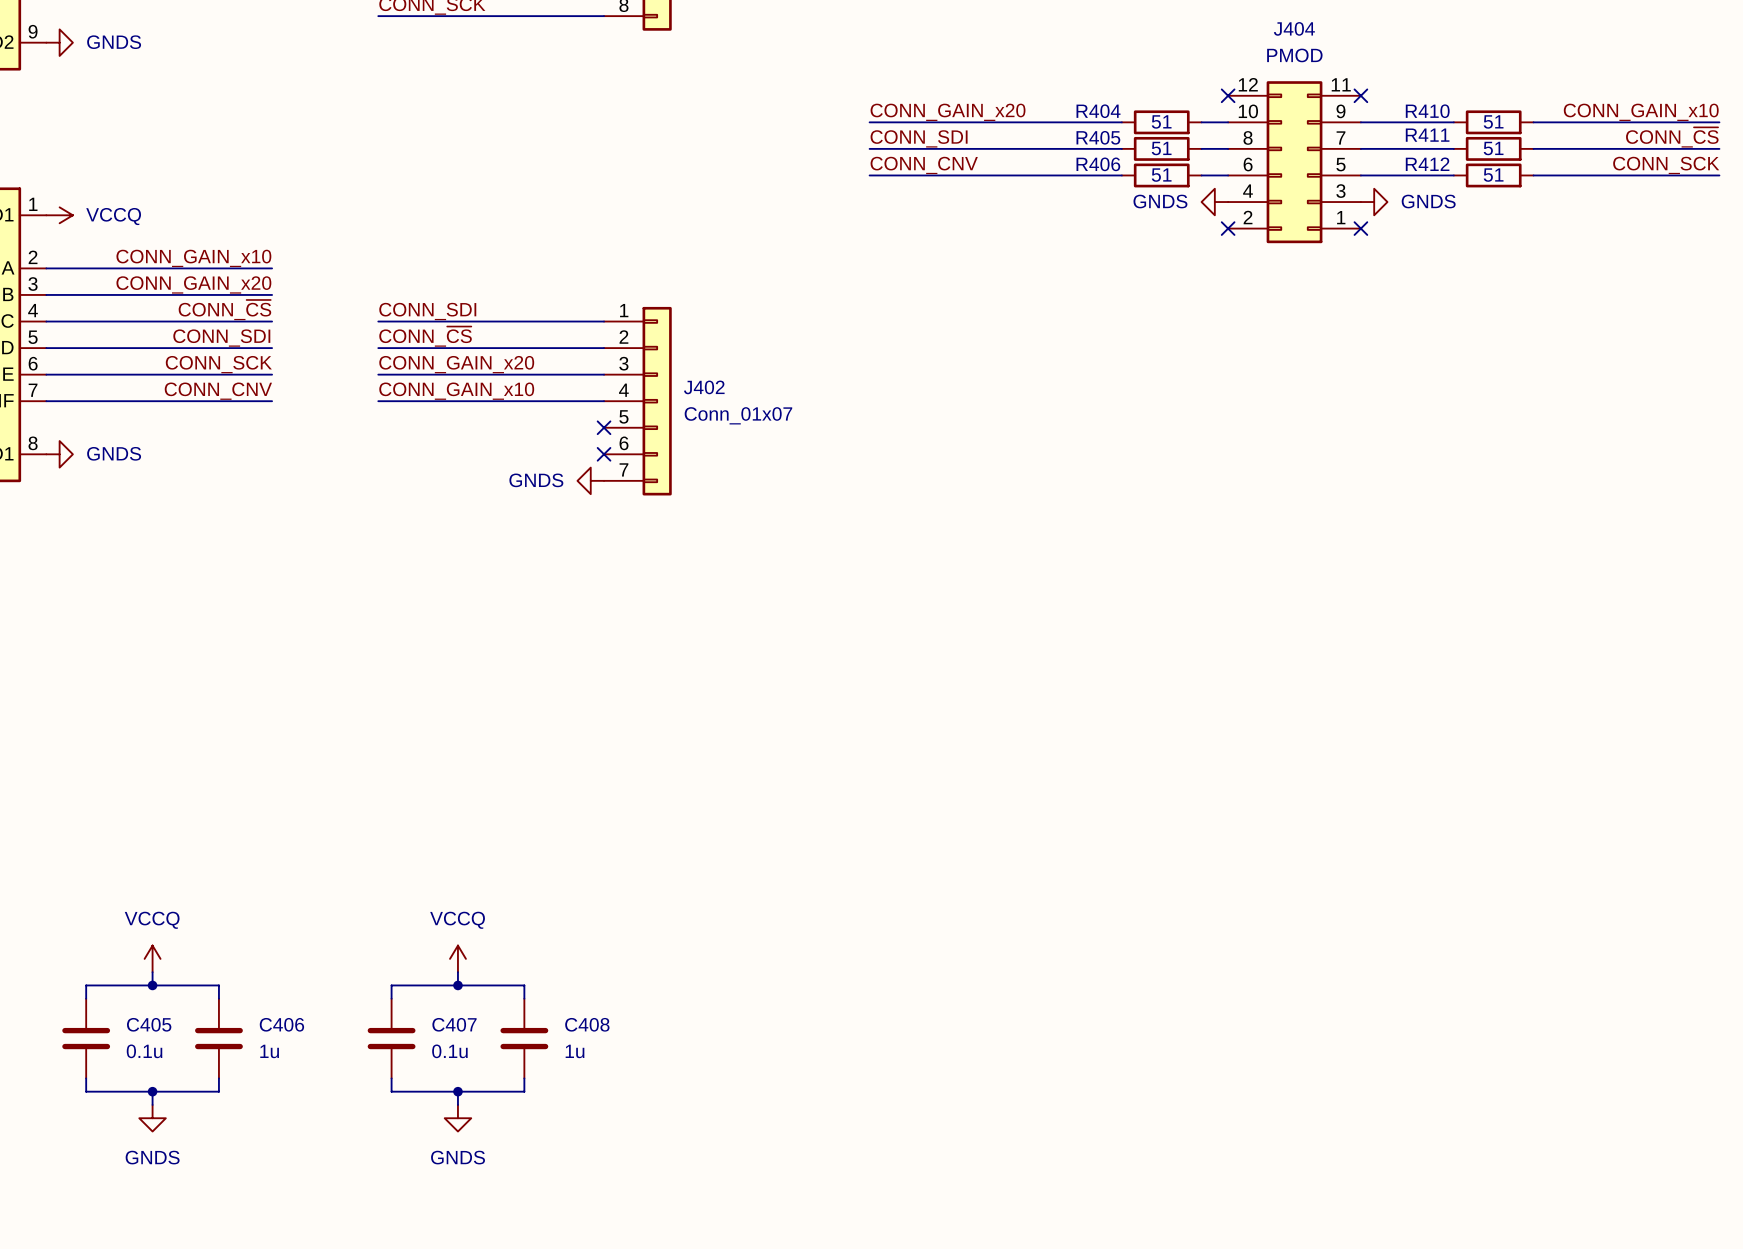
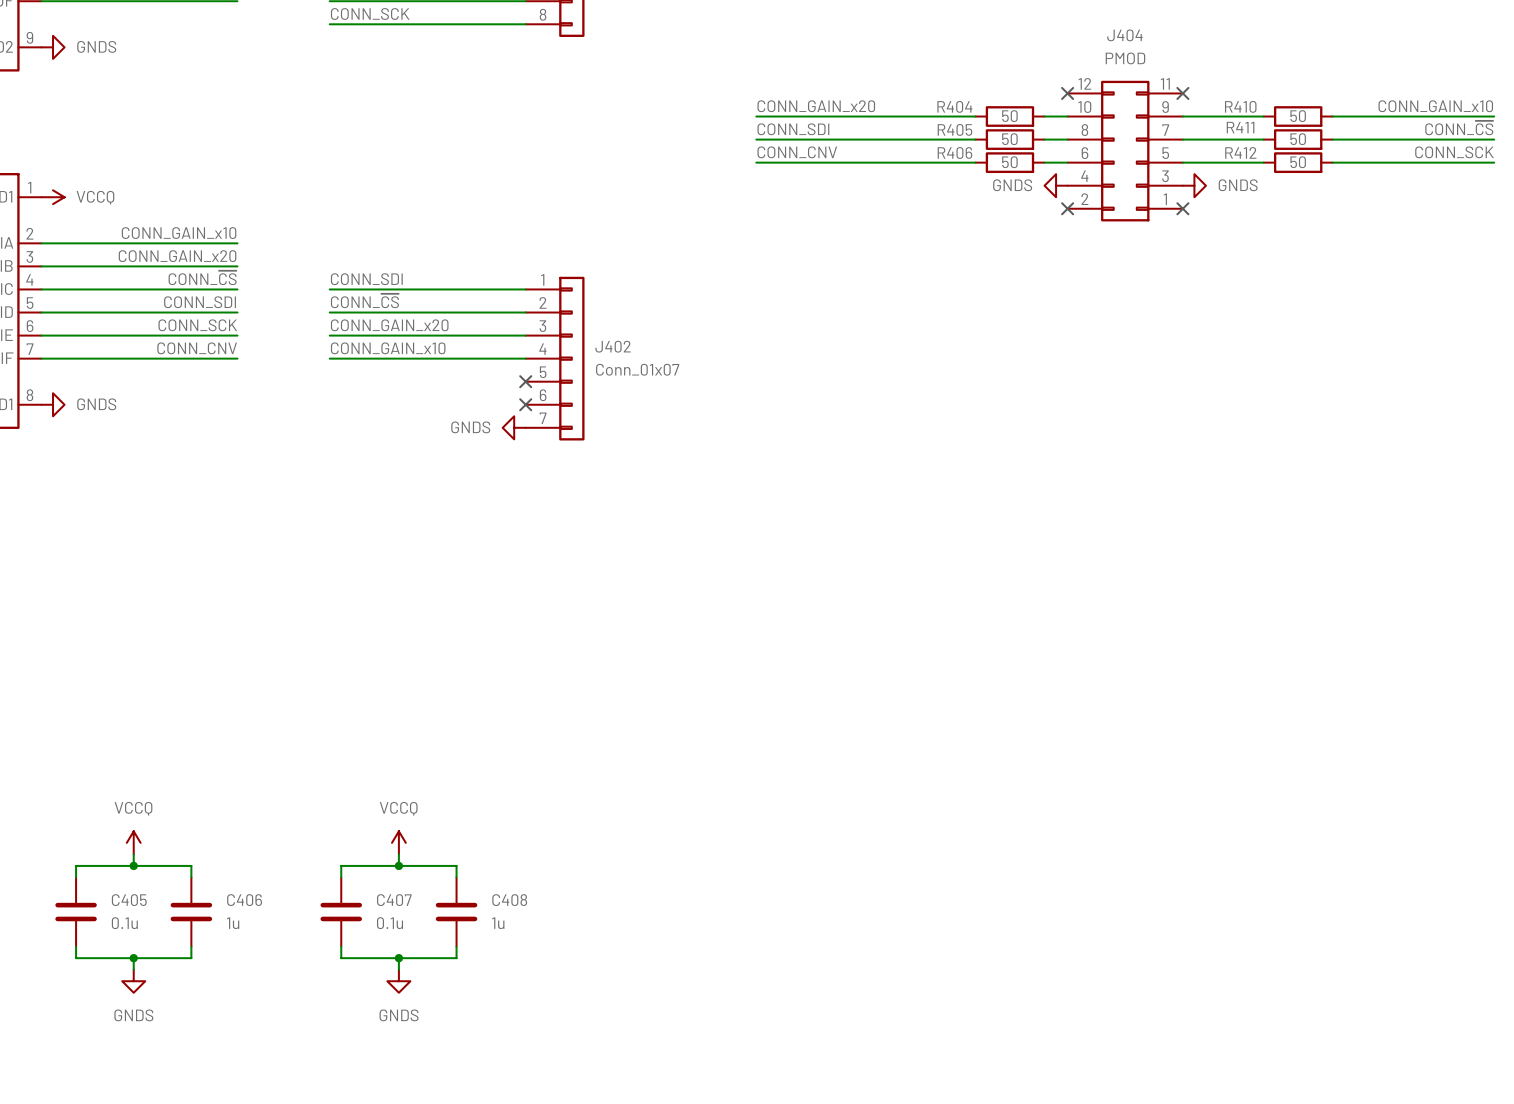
R404 value: 51 (1161, 121) -> 50 (1009, 116)
R410 value: 51 (1493, 121) -> 50 (1298, 116)
R405 value: 51 (1161, 148) -> 50 (1009, 139)
R411 value: 51 (1493, 148) -> 50 (1298, 139)
R406 value: 51 (1161, 175) -> 50 (1009, 162)
R412 value: 51 (1493, 175) -> 50 (1298, 162)

